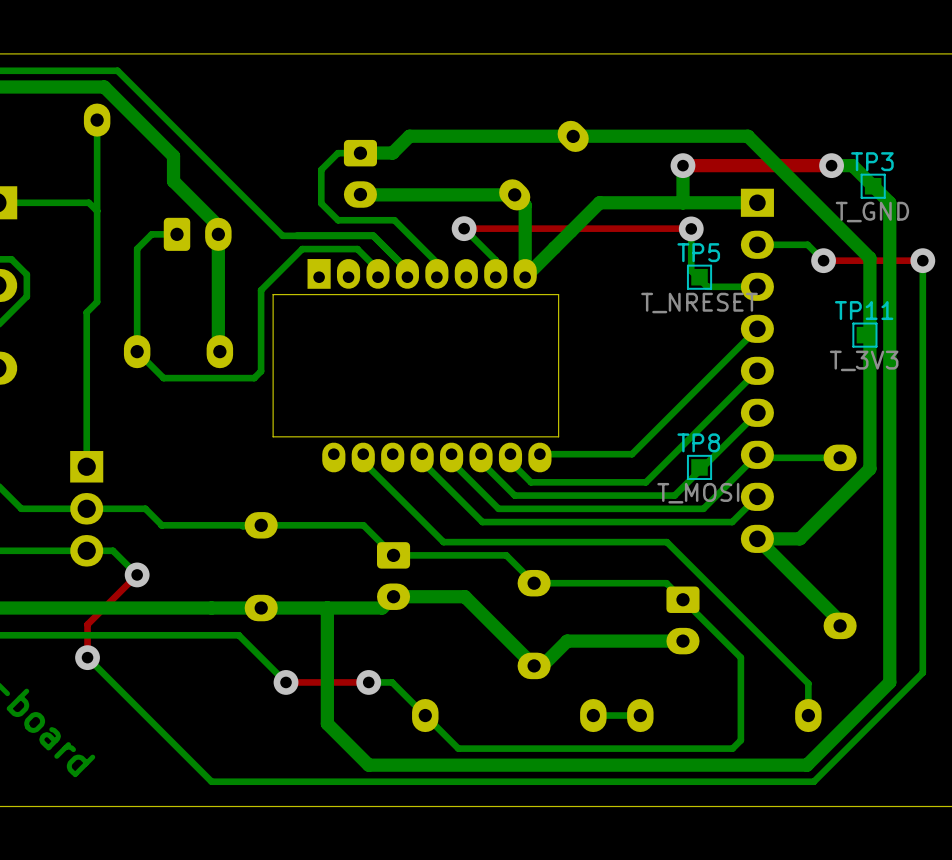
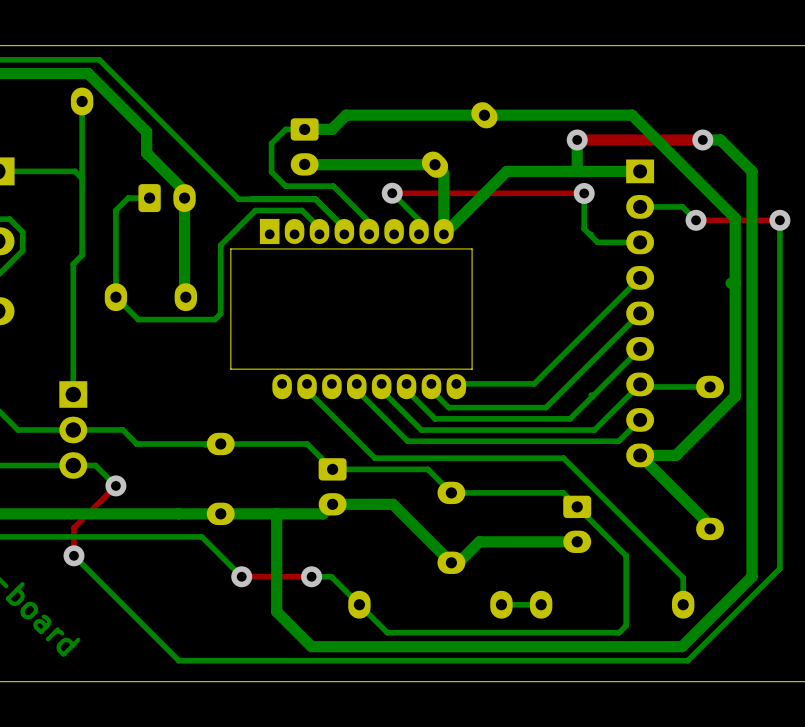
TP3: T_GND (873, 186) -> none
TP5: T_NRESET (699, 277) -> none
TP11: T_3V3 (864, 335) -> none
TP8: T_MOSI (699, 467) -> none

